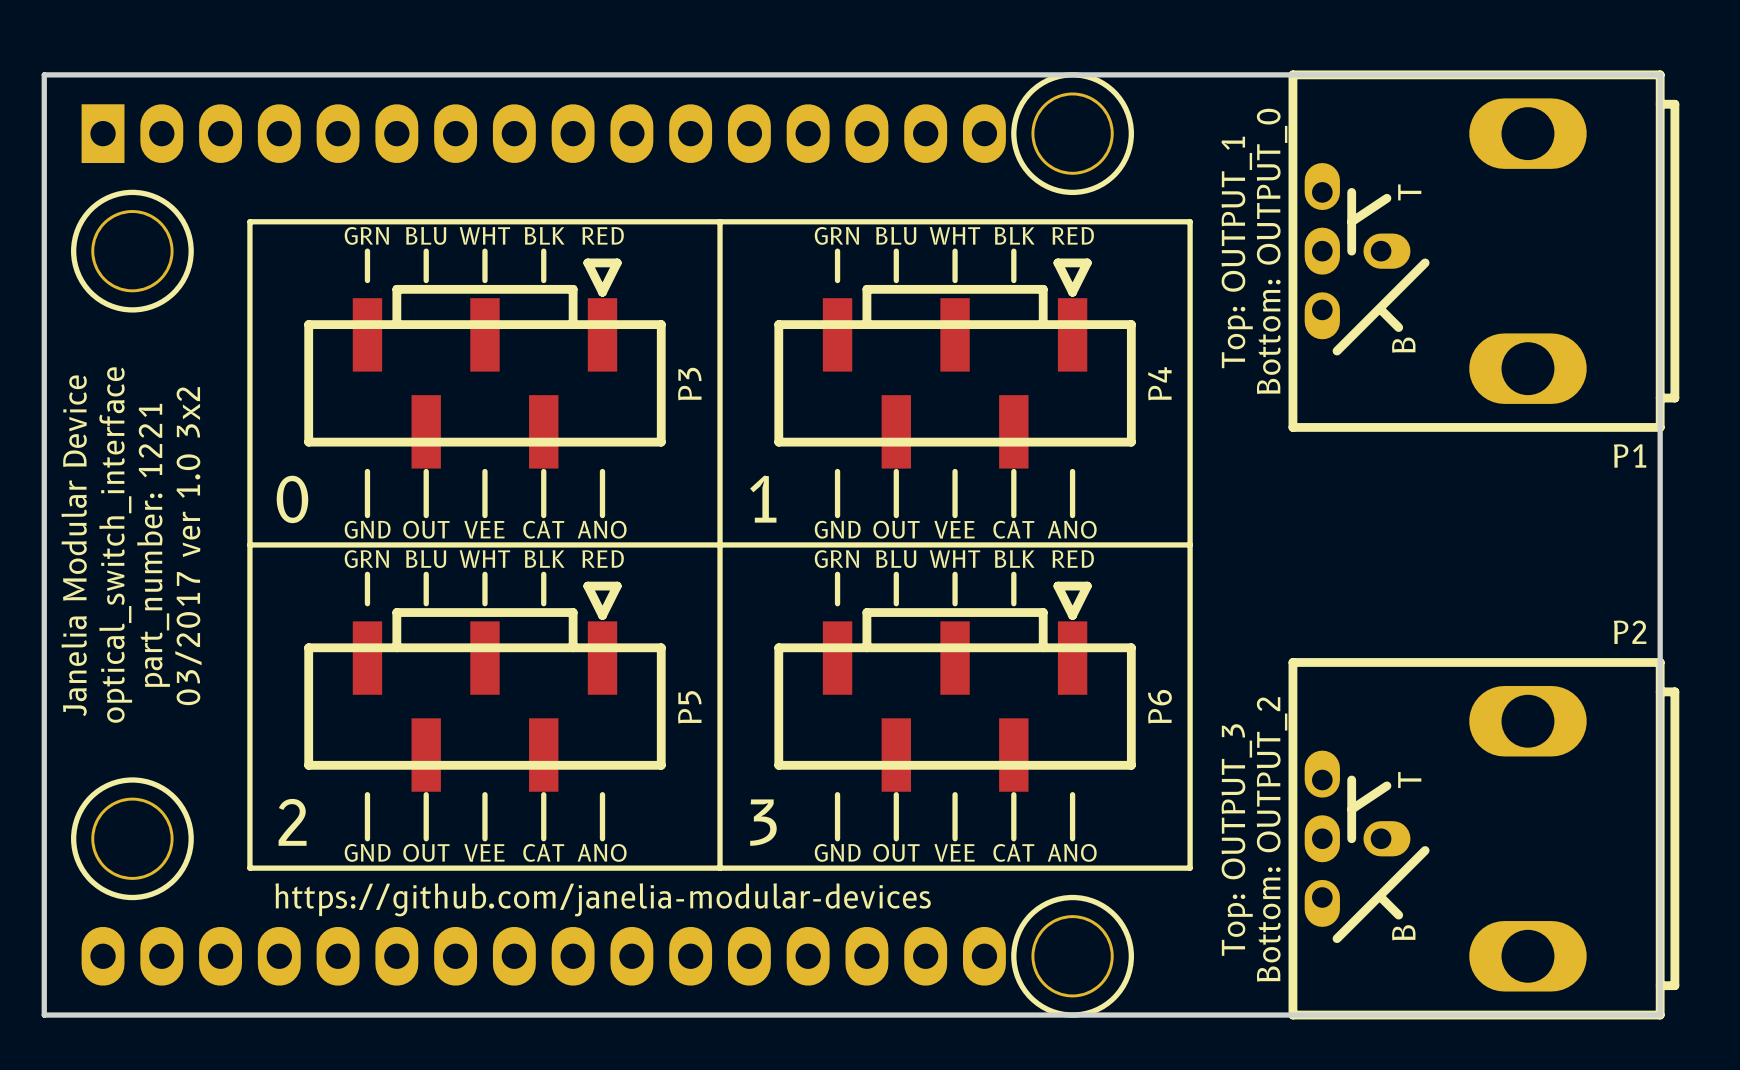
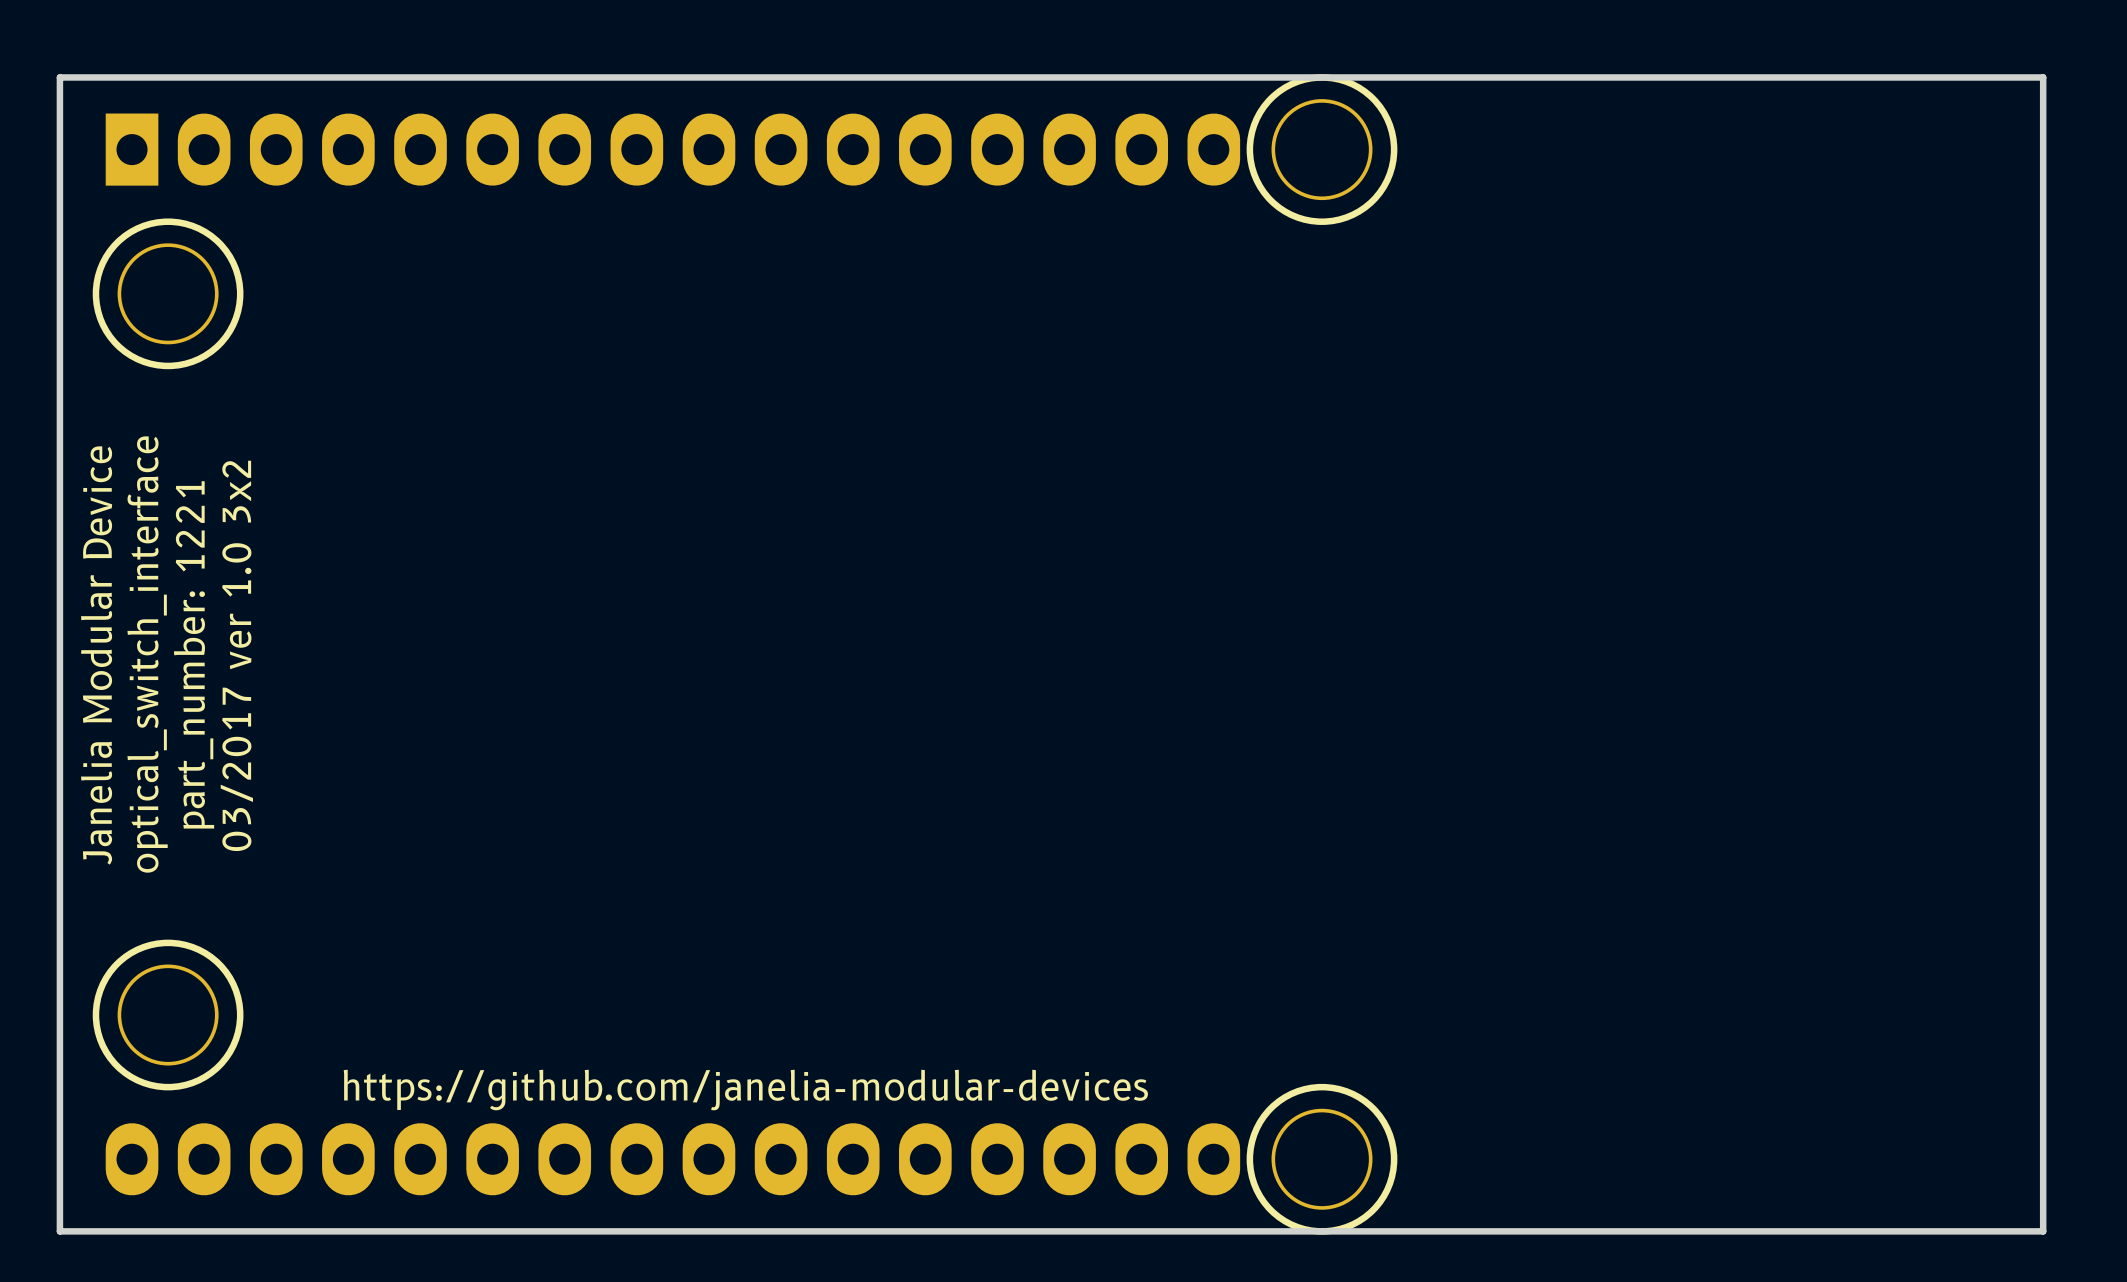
line: (249, 221) (249, 868) (1190, 868) (1190, 221) (249, 221) -> none
line: (720, 221) (720, 868) -> none
text: GRN (366, 235) -> none
text: BLU (426, 235) -> none
text: WHT (484, 235) -> none
text: BLK (544, 235) -> none
text: RED (603, 235) -> none
text: GRN (836, 235) -> none
text: BLU (896, 235) -> none
text: WHT (954, 235) -> none
text: BLK (1014, 235) -> none
text: RED (1073, 235) -> none
line: (367, 251) (367, 280) -> none
line: (426, 251) (426, 280) -> none
line: (484, 251) (484, 280) -> none
line: (543, 251) (543, 280) -> none
line: (837, 251) (837, 280) -> none
line: (896, 251) (896, 280) -> none
line: (955, 251) (955, 280) -> none
line: (1013, 251) (1013, 280) -> none
P1: (1483, 251) -> none
P3: (484, 363) -> none
P4: (955, 363) -> none
line: (367, 471) (367, 515) -> none
line: (426, 471) (426, 515) -> none
line: (484, 471) (484, 515) -> none
line: (543, 471) (543, 515) -> none
line: (602, 471) (602, 515) -> none
line: (837, 471) (837, 515) -> none
line: (896, 471) (896, 515) -> none
line: (955, 471) (955, 515) -> none
line: (1013, 471) (1013, 515) -> none
line: (1072, 471) (1072, 515) -> none
text: 0 (292, 499) -> none
text: 1 (763, 499) -> none
text: GND (367, 529) -> none
text: OUT (426, 529) -> none
text: VEE (484, 529) -> none
text: CAT (543, 529) -> none
text: ANO (602, 529) -> none
text: GND (837, 529) -> none
text: OUT (896, 529) -> none
text: VEE (954, 529) -> none
text: CAT (1013, 529) -> none
text: ANO (1072, 529) -> none
line: (249, 544) (1190, 544) -> none
text: WHT (484, 558) -> none
text: BLK (544, 558) -> none
text: WHT (954, 558) -> none
text: BLK (1014, 558) -> none
text: GRN (366, 559) -> none
text: BLU (426, 559) -> none
text: RED (603, 559) -> none
text: GRN (836, 559) -> none
text: BLU (896, 559) -> none
text: RED (1073, 559) -> none
line: (367, 574) (367, 603) -> none
line: (426, 574) (426, 603) -> none
line: (484, 574) (484, 603) -> none
line: (543, 574) (543, 603) -> none
line: (837, 574) (837, 603) -> none
line: (896, 574) (896, 603) -> none
line: (955, 574) (955, 603) -> none
line: (1013, 574) (1013, 603) -> none
P5: (484, 686) -> none
P6: (955, 686) -> none
line: (367, 794) (367, 838) -> none
line: (426, 794) (426, 838) -> none
line: (484, 794) (484, 838) -> none
line: (543, 794) (543, 838) -> none
line: (602, 794) (602, 838) -> none
line: (837, 794) (837, 838) -> none
line: (896, 794) (896, 838) -> none
line: (955, 794) (955, 838) -> none
line: (1013, 794) (1013, 838) -> none
line: (1072, 794) (1072, 838) -> none
text: 2 (292, 822) -> none
text: 3 (763, 822) -> none
P2: (1483, 838) -> none
text: GND (367, 852) -> none
text: OUT (426, 852) -> none
text: VEE (484, 852) -> none
text: CAT (543, 852) -> none
text: ANO (602, 852) -> none
text: GND (837, 852) -> none
text: OUT (896, 852) -> none
text: VEE (954, 852) -> none
text: CAT (1013, 852) -> none
text: ANO (1072, 852) -> none

